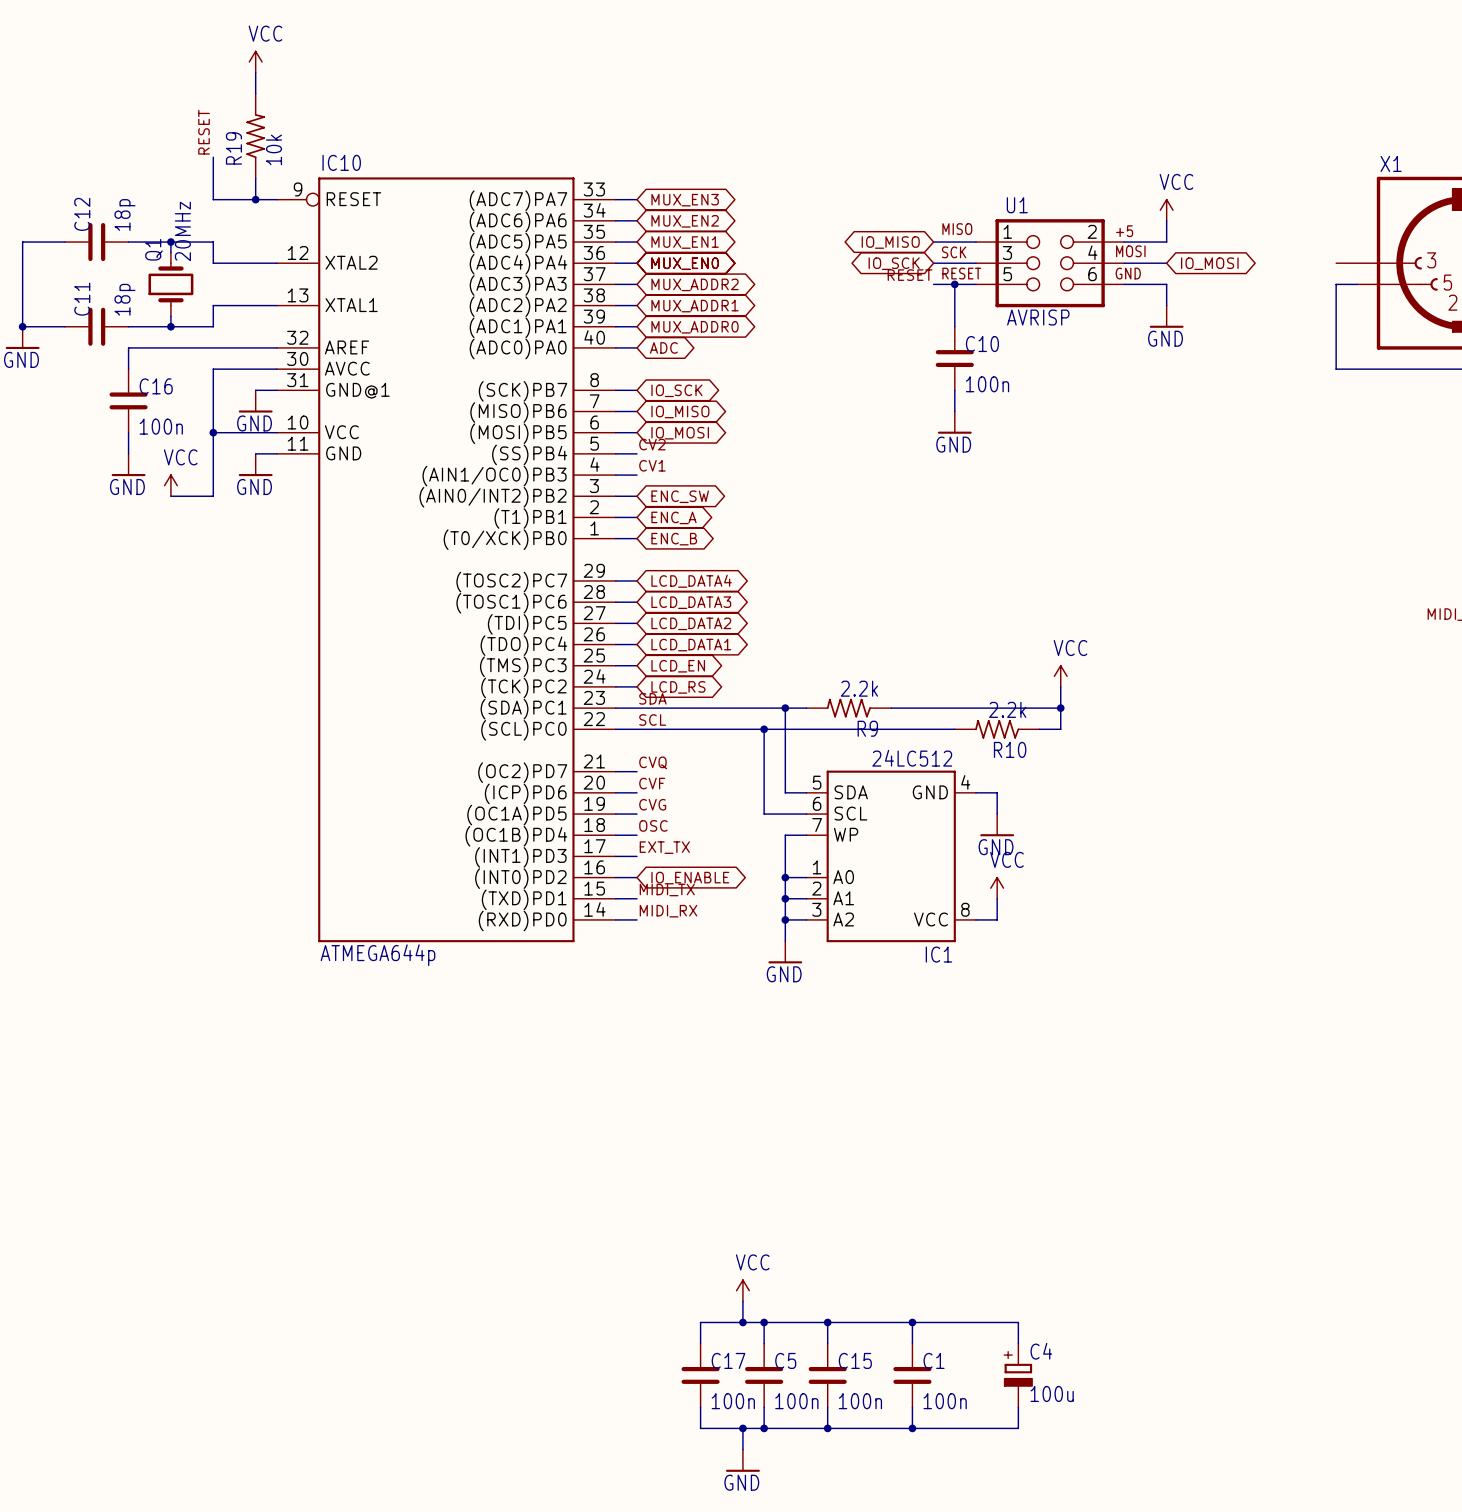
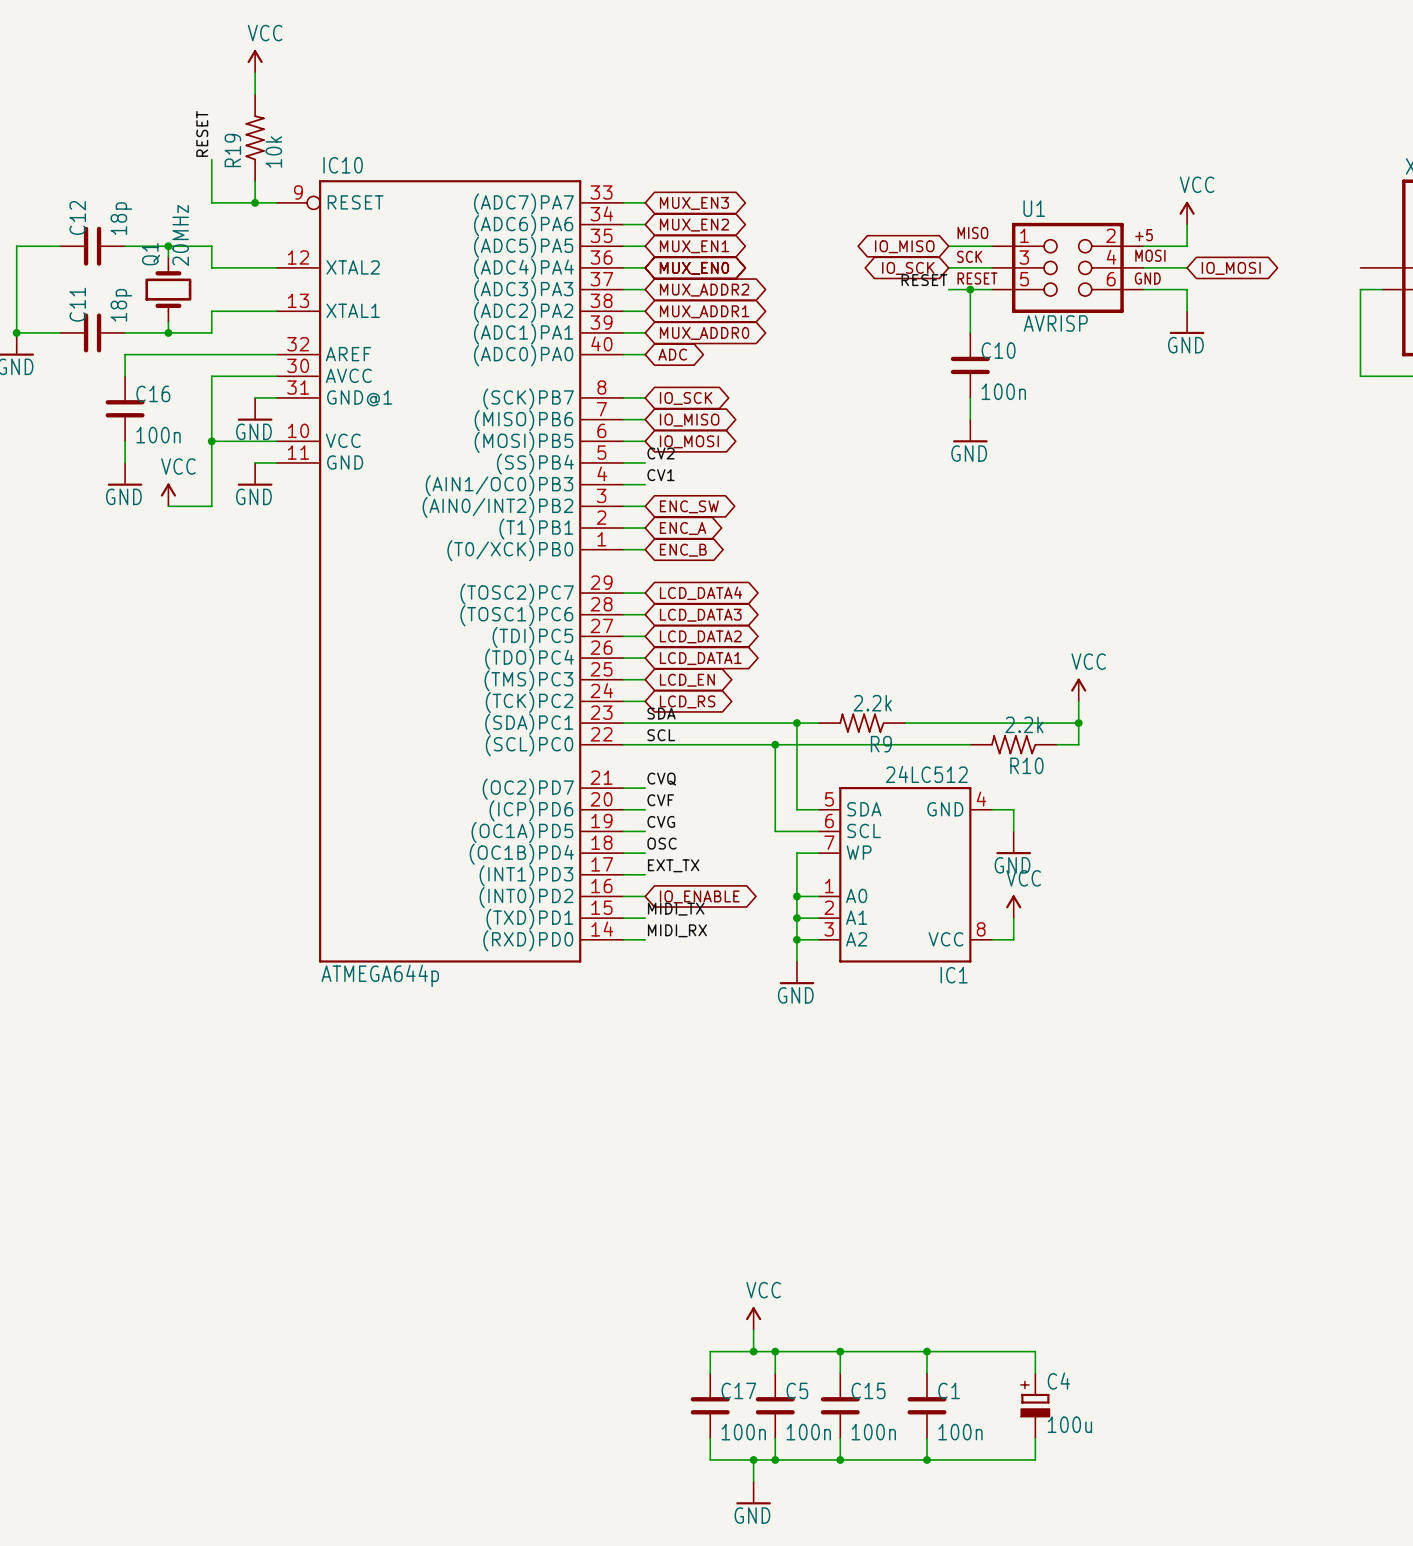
power symbol shape: [249, 51, 263, 73] -> [247, 50, 263, 73]
power symbol shape: [1160, 199, 1174, 221] -> [1179, 201, 1195, 225]
power symbol shape: [164, 475, 178, 497] -> [160, 483, 177, 507]
power symbol shape: [1054, 665, 1068, 687] -> [1071, 678, 1087, 702]
power symbol shape: [990, 877, 1004, 899] -> [1006, 895, 1022, 919]
power symbol shape: [736, 1280, 750, 1302] -> [746, 1307, 762, 1330]

